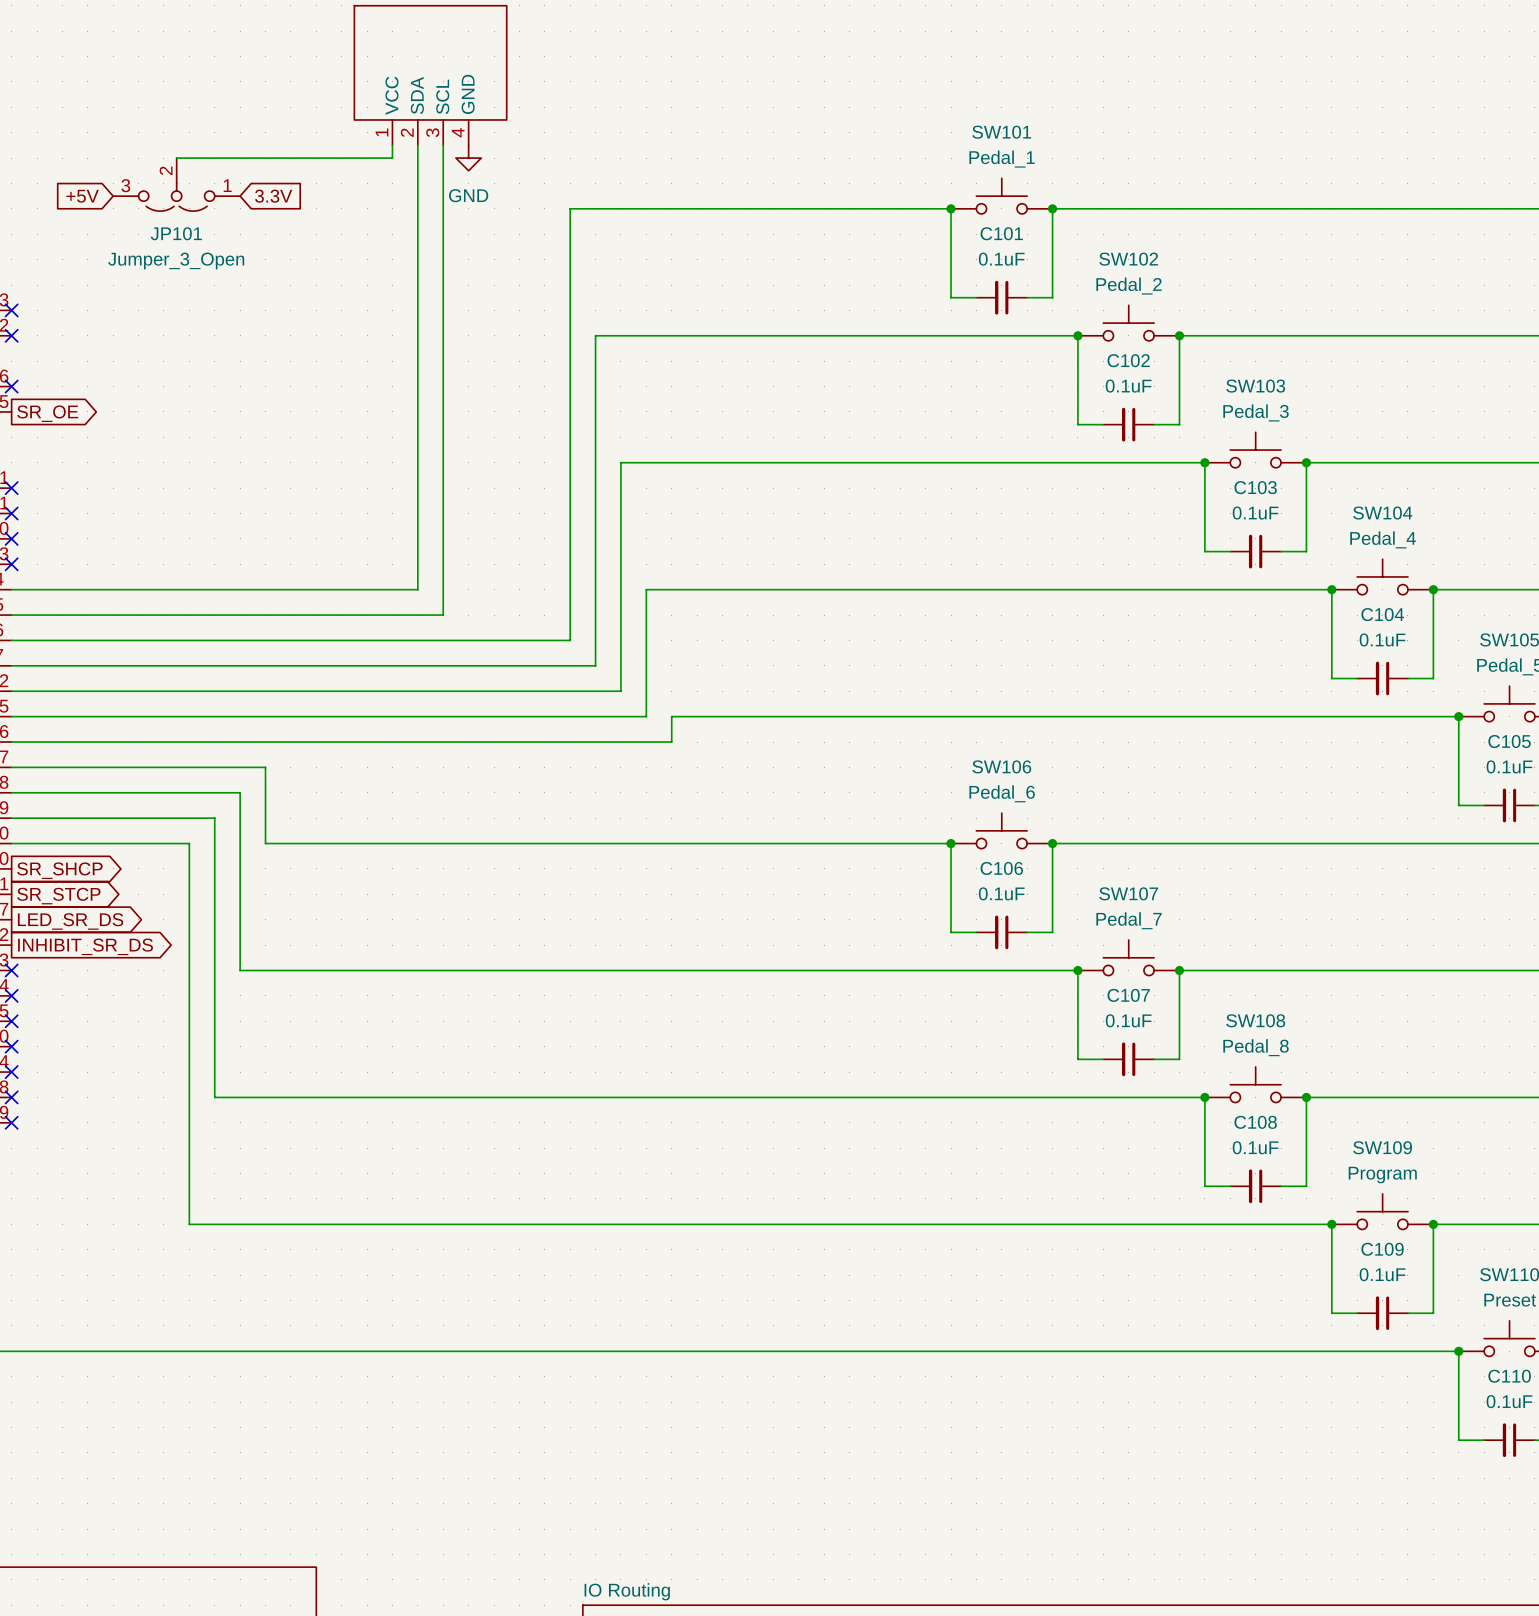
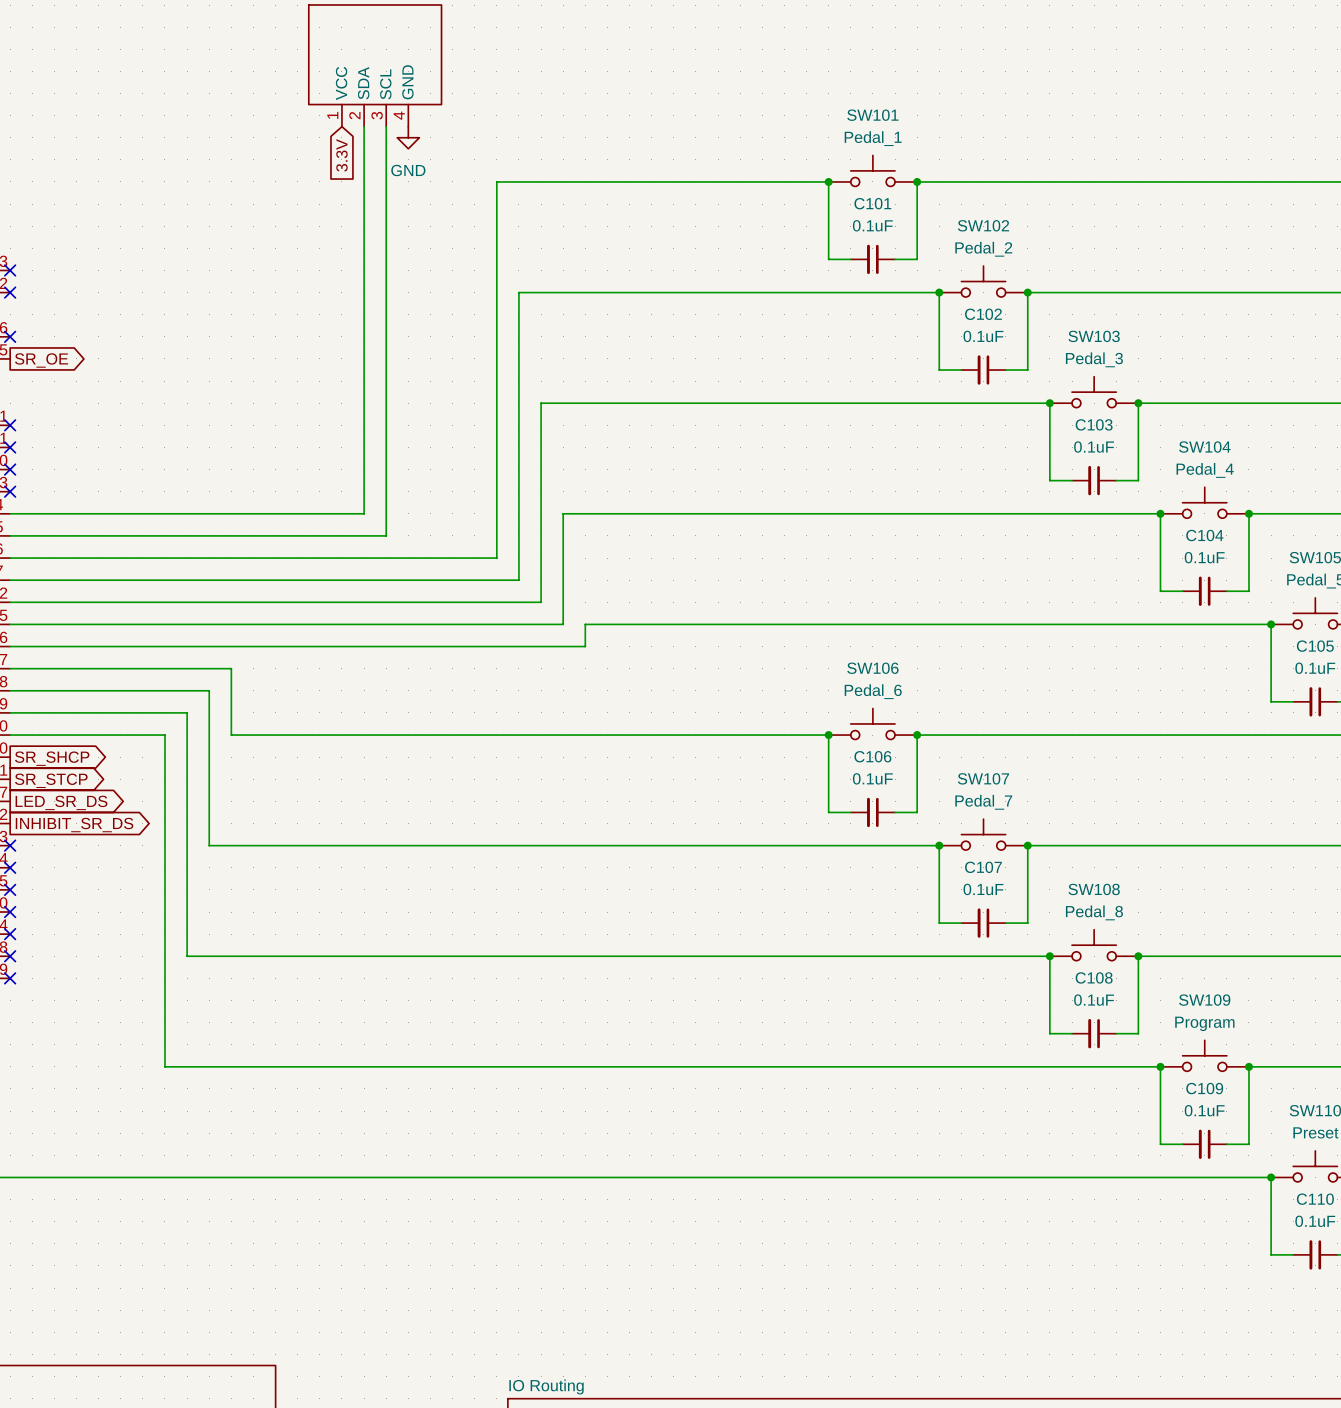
wire: (392, 145) (392, 158) (176, 158) -> none
JP101: Jumper_3_Open (176, 184) -> none
global label: +5V (82, 196) -> none
global label rotation: 0° (273, 196) -> 90° clockwise (341, 155)
global label position: 3.3V (273, 196) -> 3.3V (341, 155)

